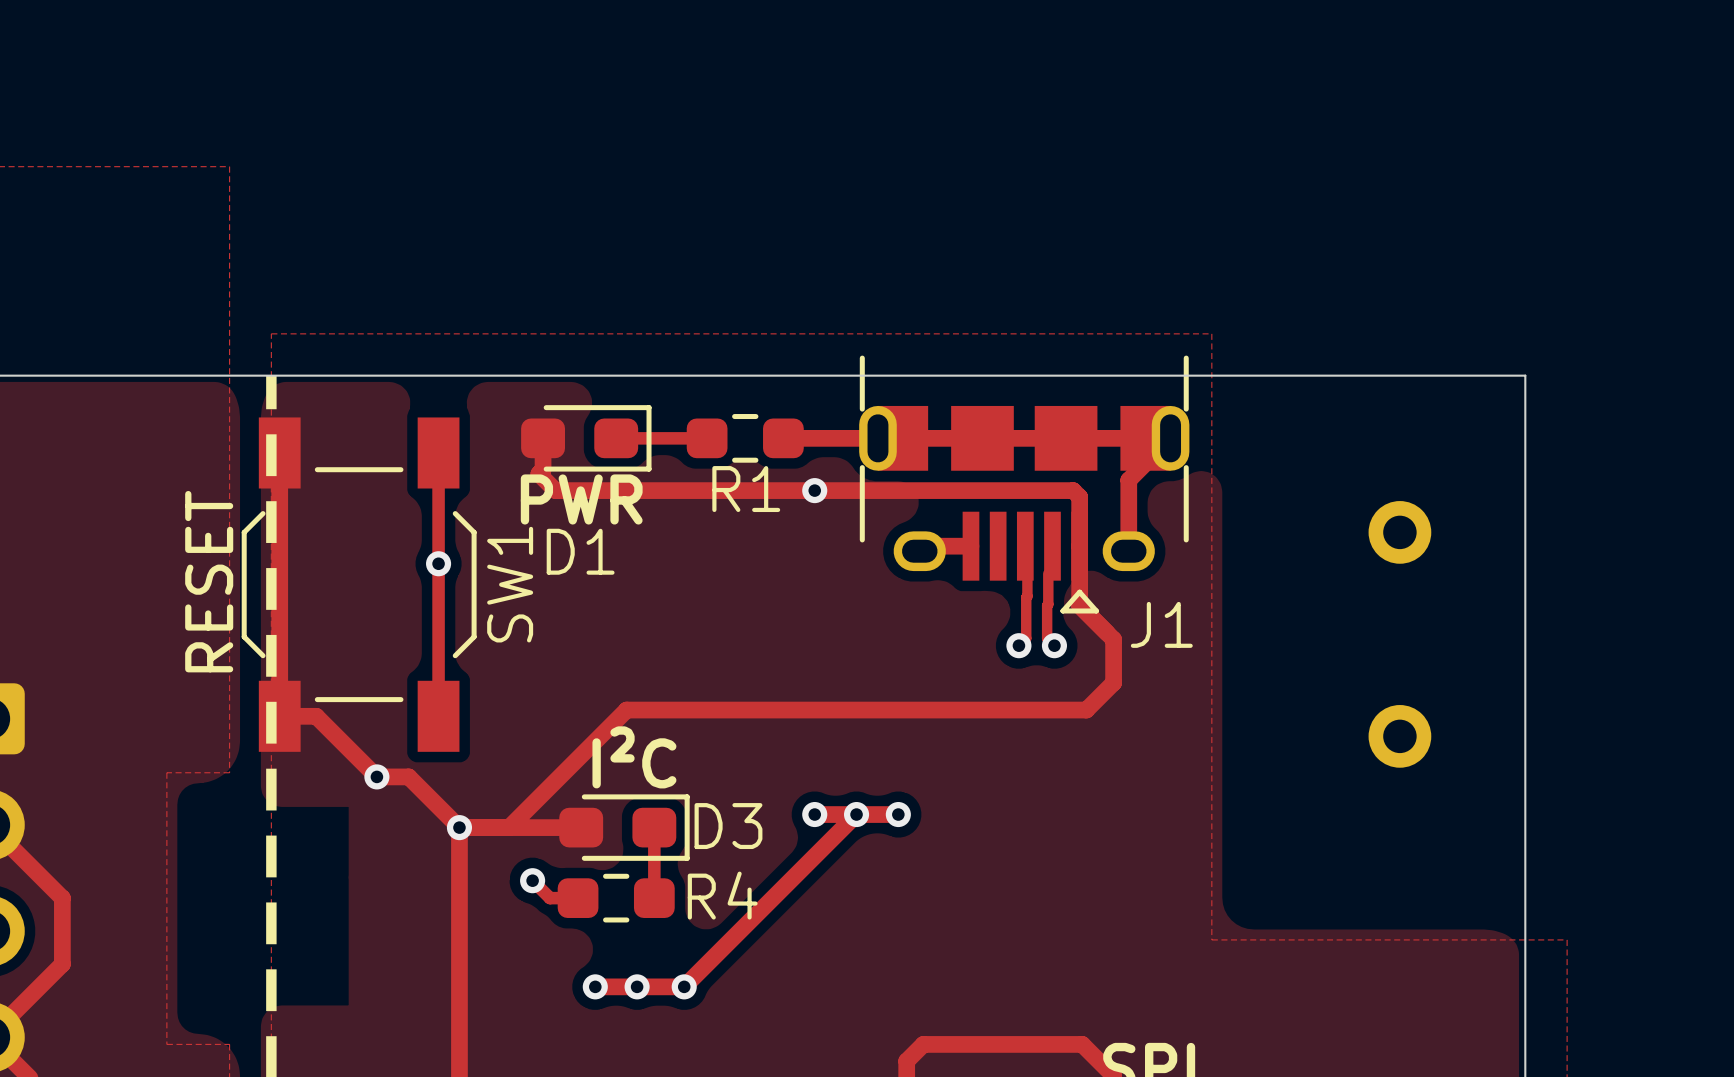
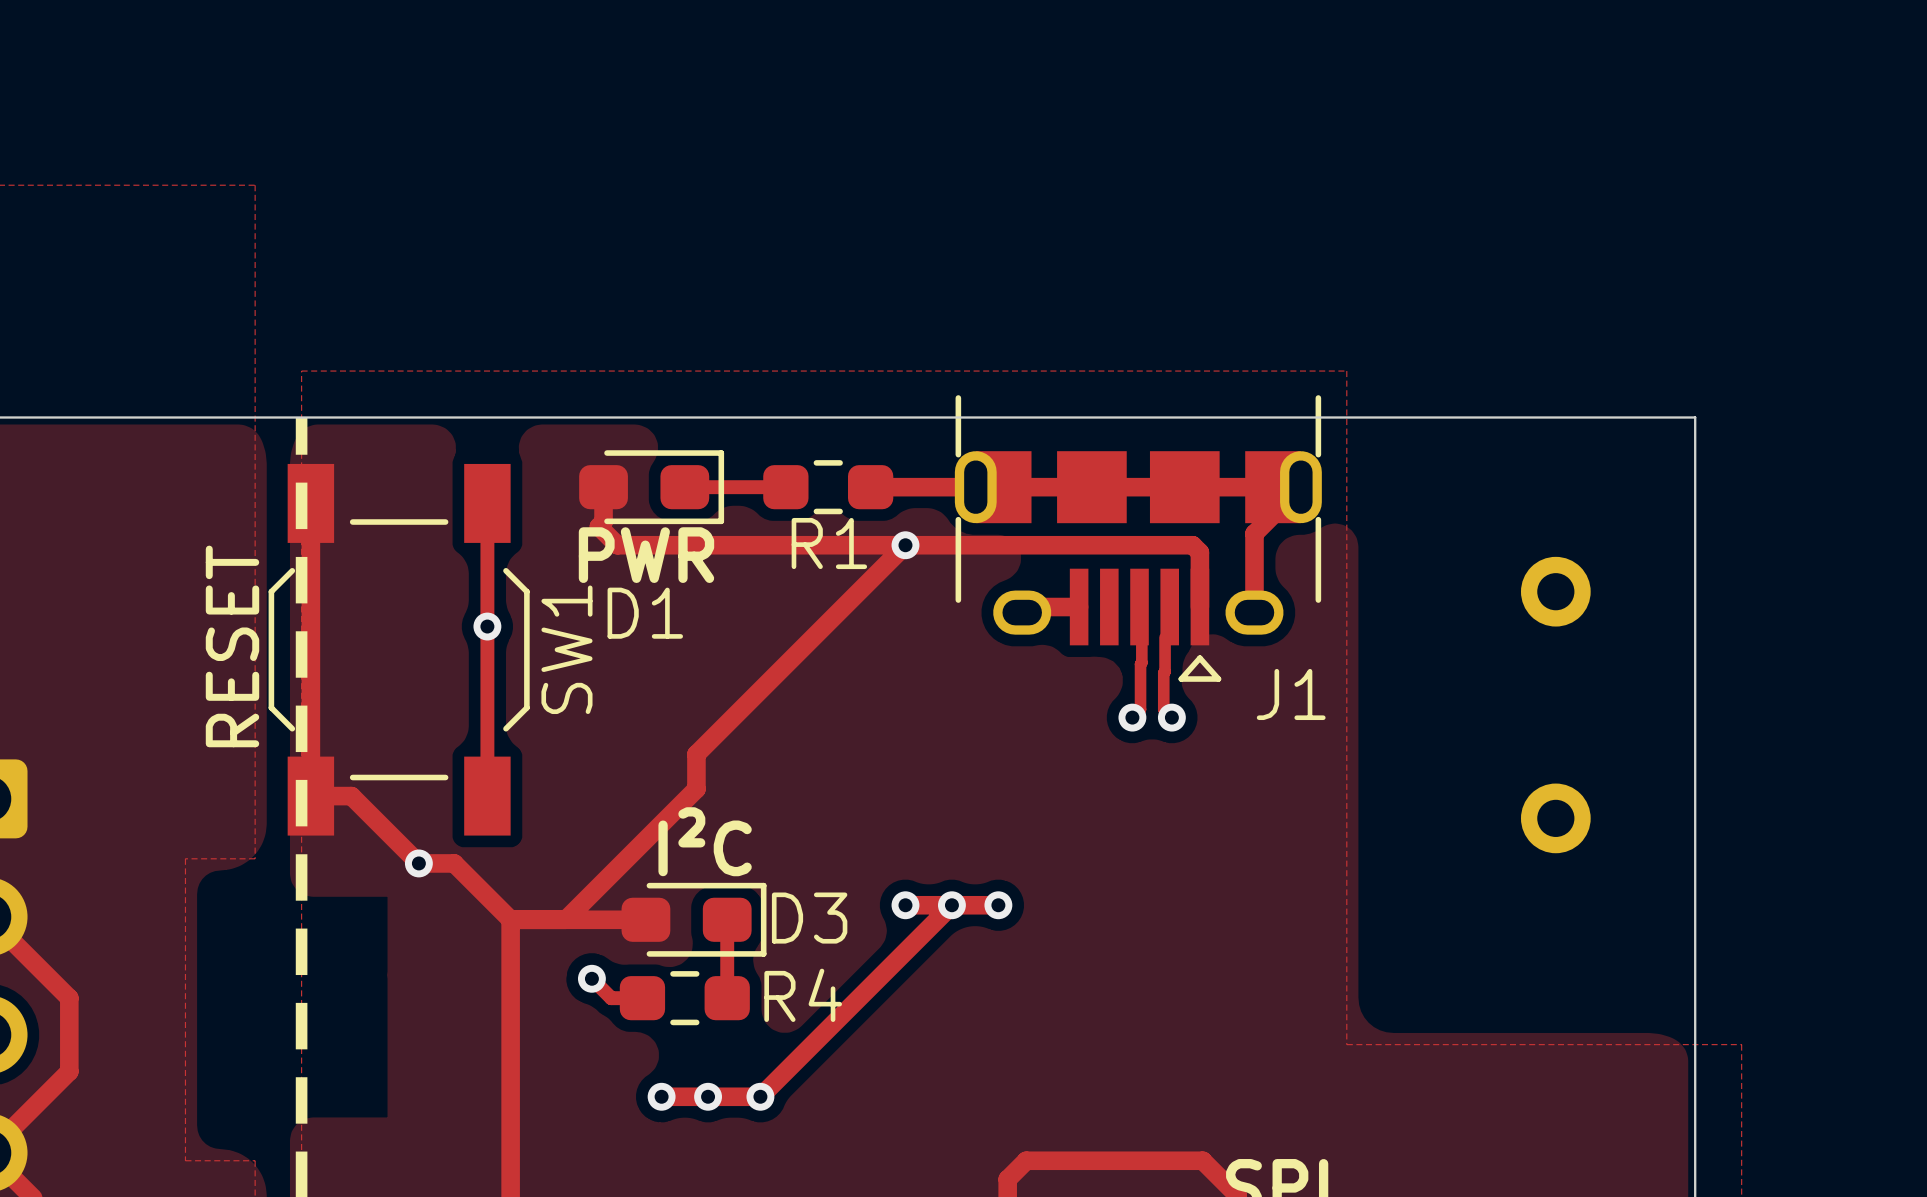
track: (1079, 546) (1079, 605) (1113, 639) (1113, 682) (1086, 710) (626, 710) -> (905, 545) (696, 754) (696, 789)
via: (459, 827) -> none

